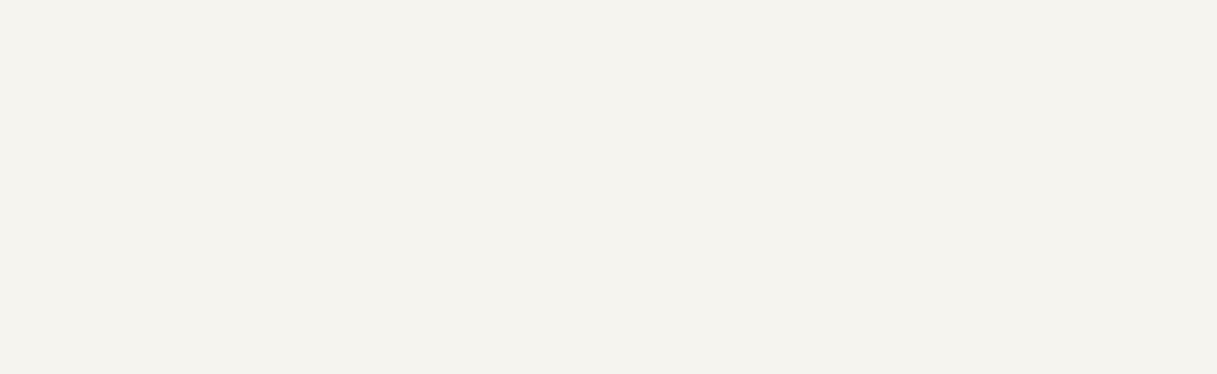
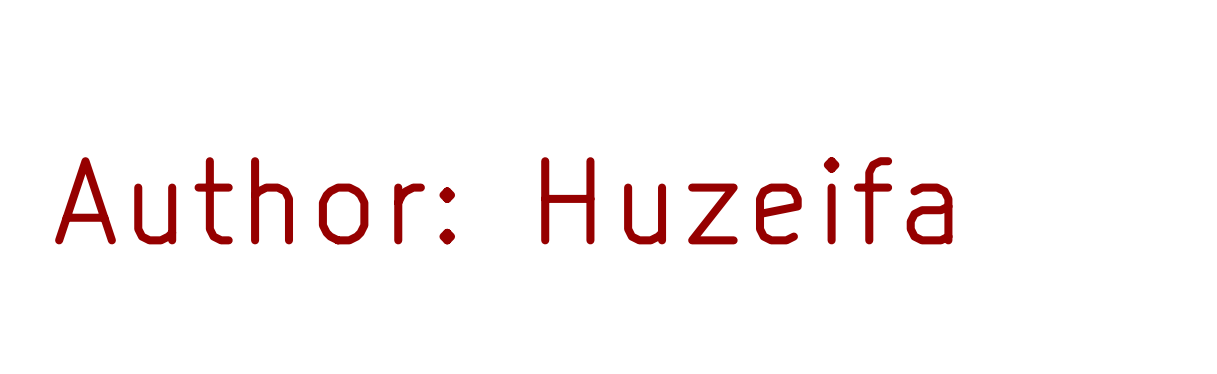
title block: none -> Author: Huzeifa (503, 200)

